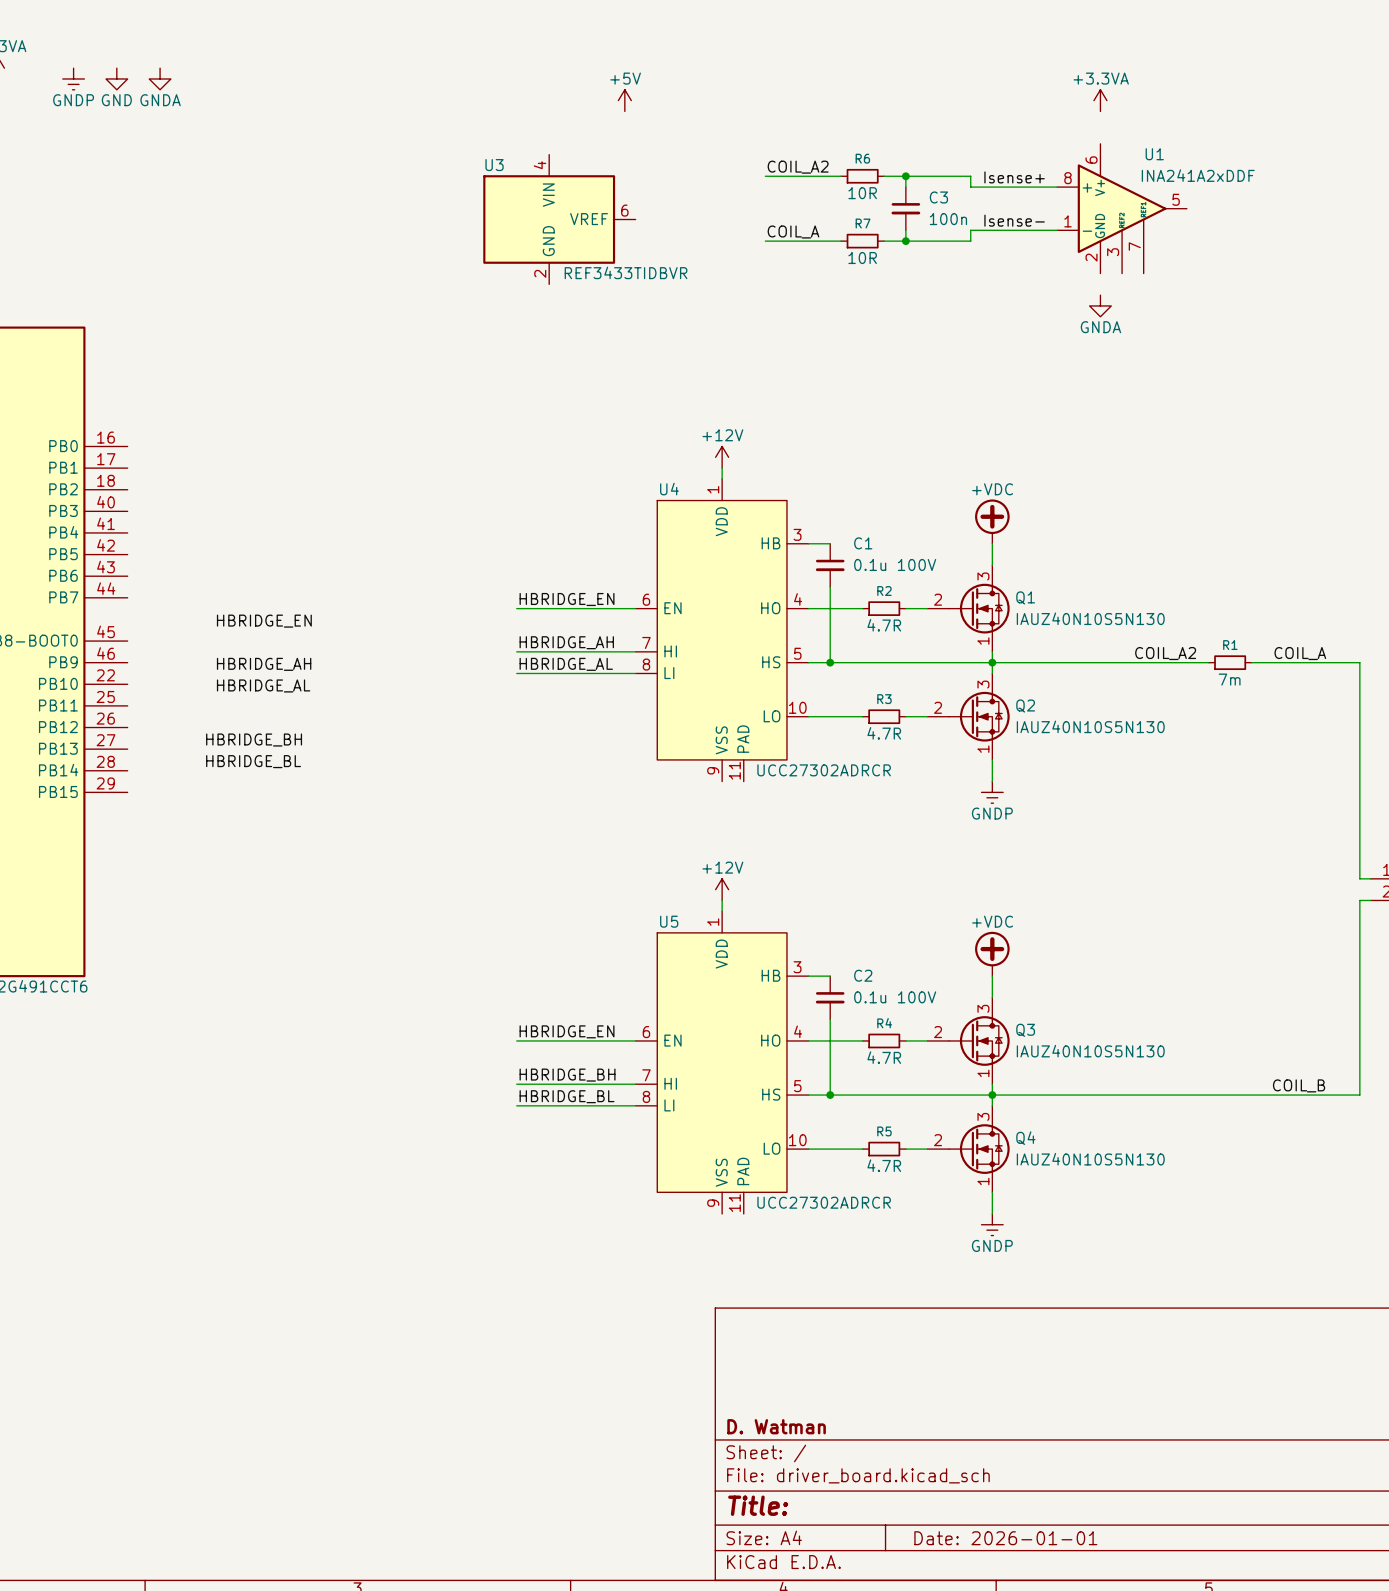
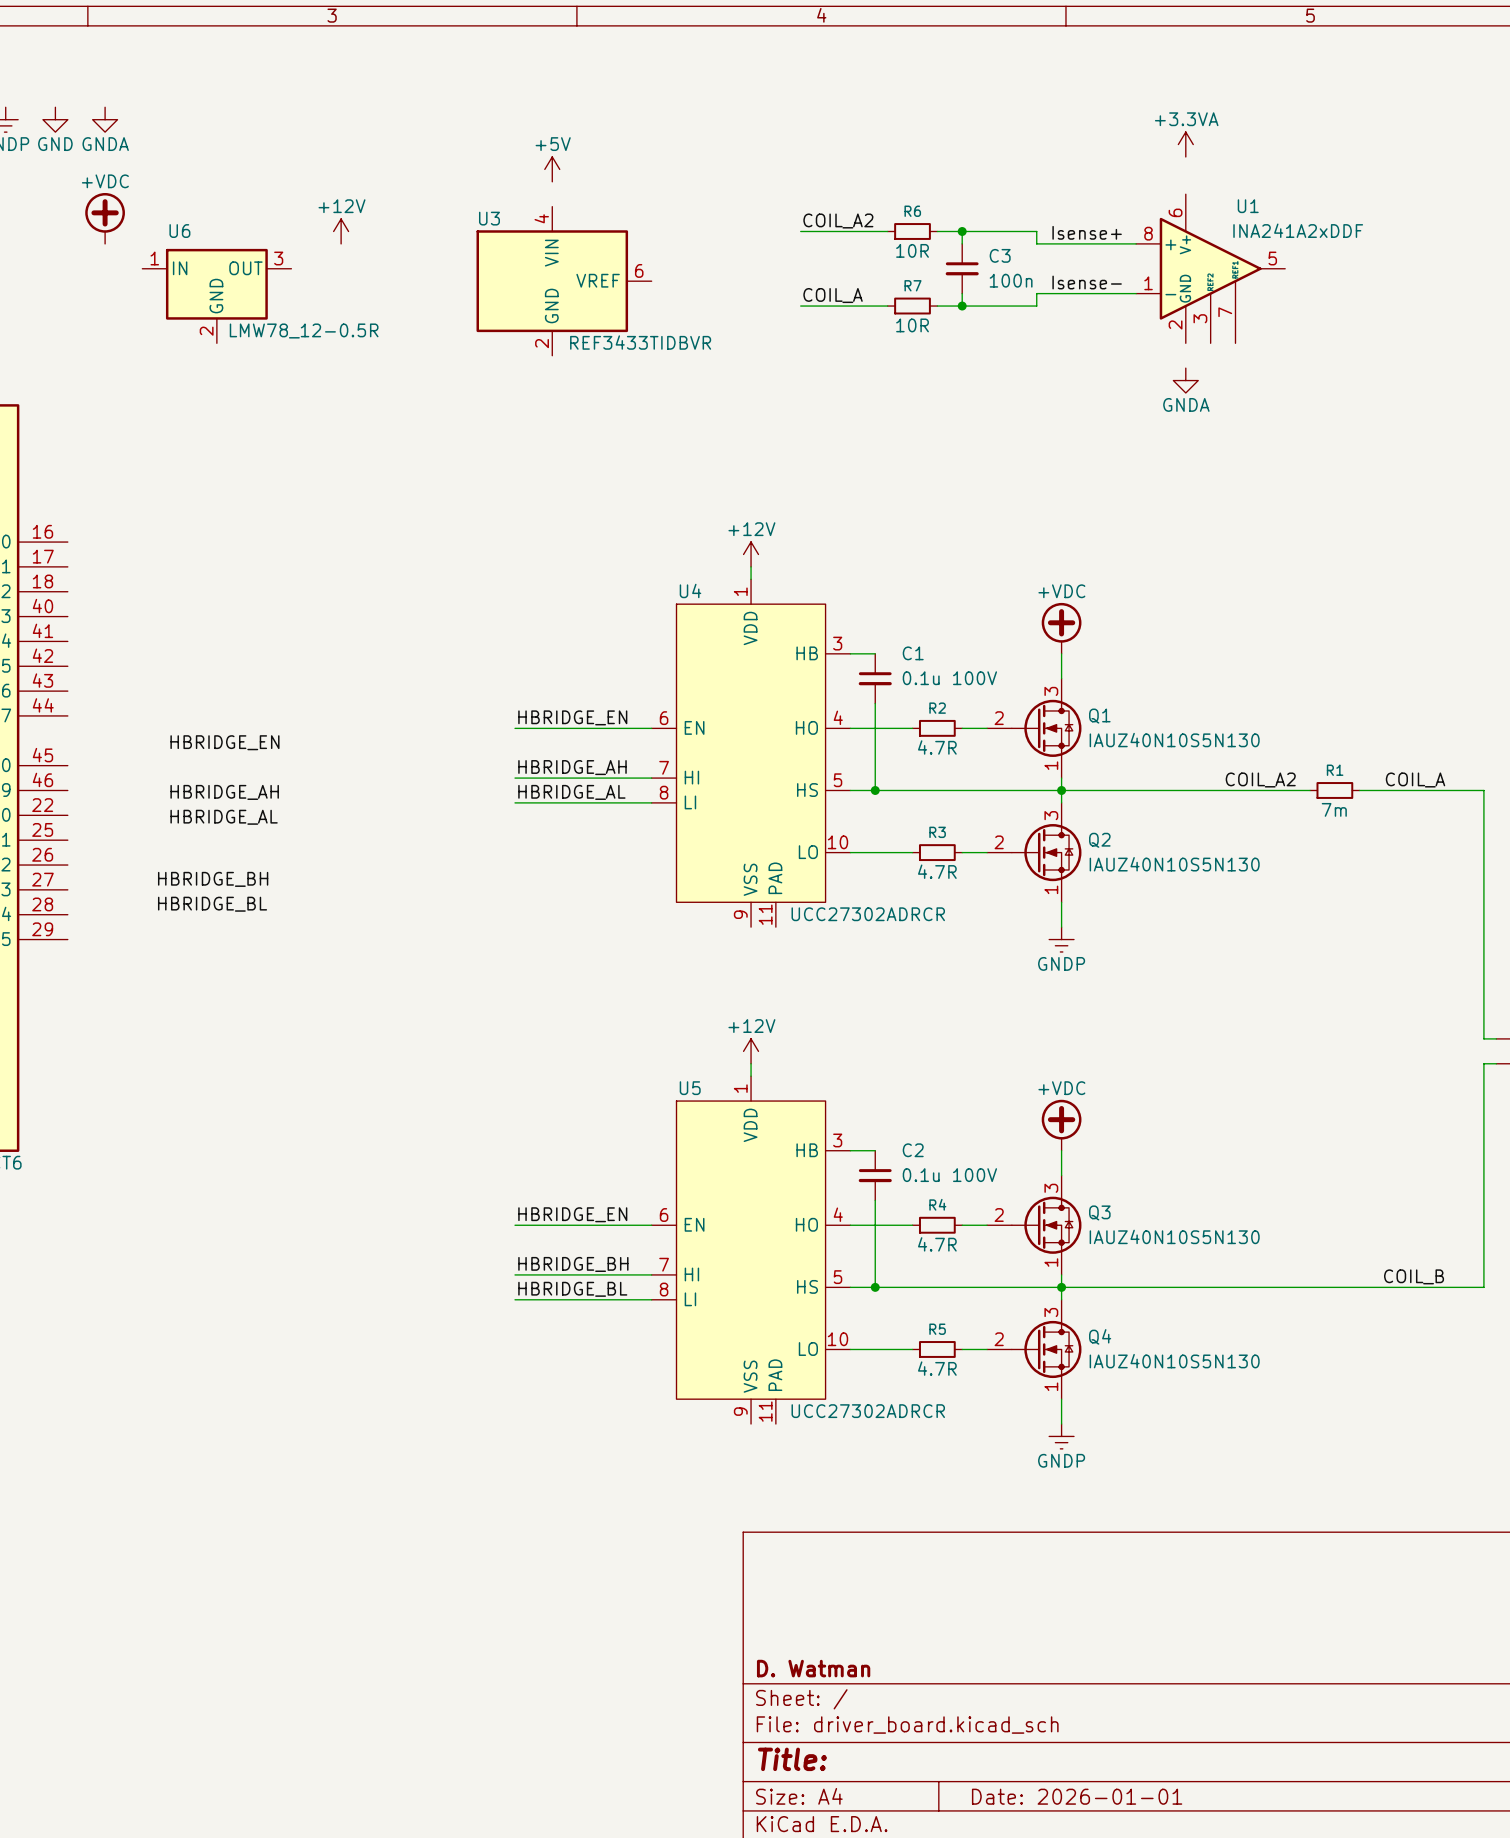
power symbol position: +5V (624, 100) -> +5V (552, 169)
power symbol: none -> +VDC (105, 218)
power symbol: none -> +12V (341, 231)
U6: none -> LMW78_12-0.5R (216, 296)

